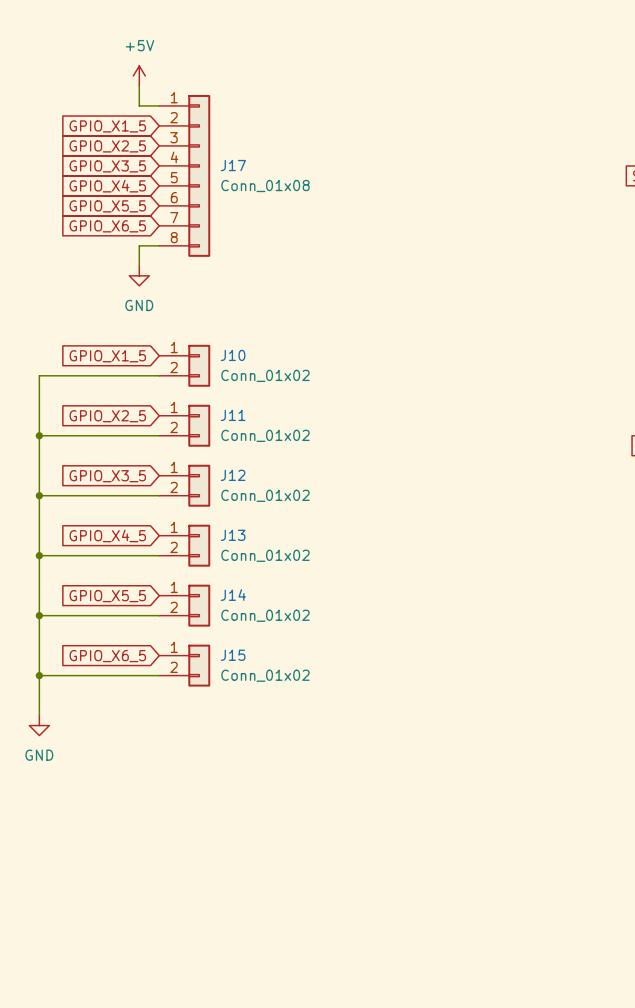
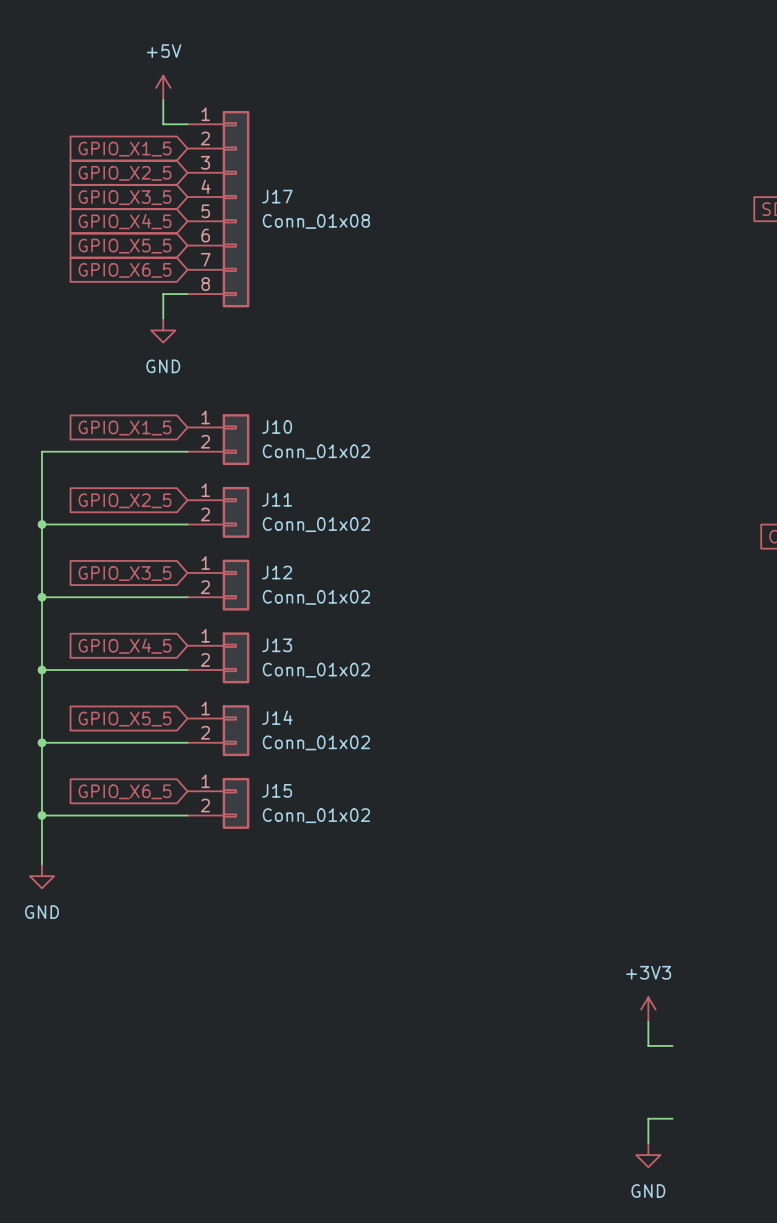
power symbol: none -> +3V3 (648, 1009)
wire: none -> (648, 1021) (648, 1045) (672, 1045)
wire: none -> (672, 1118) (648, 1118) (648, 1142)
power symbol: none -> GND (648, 1155)

